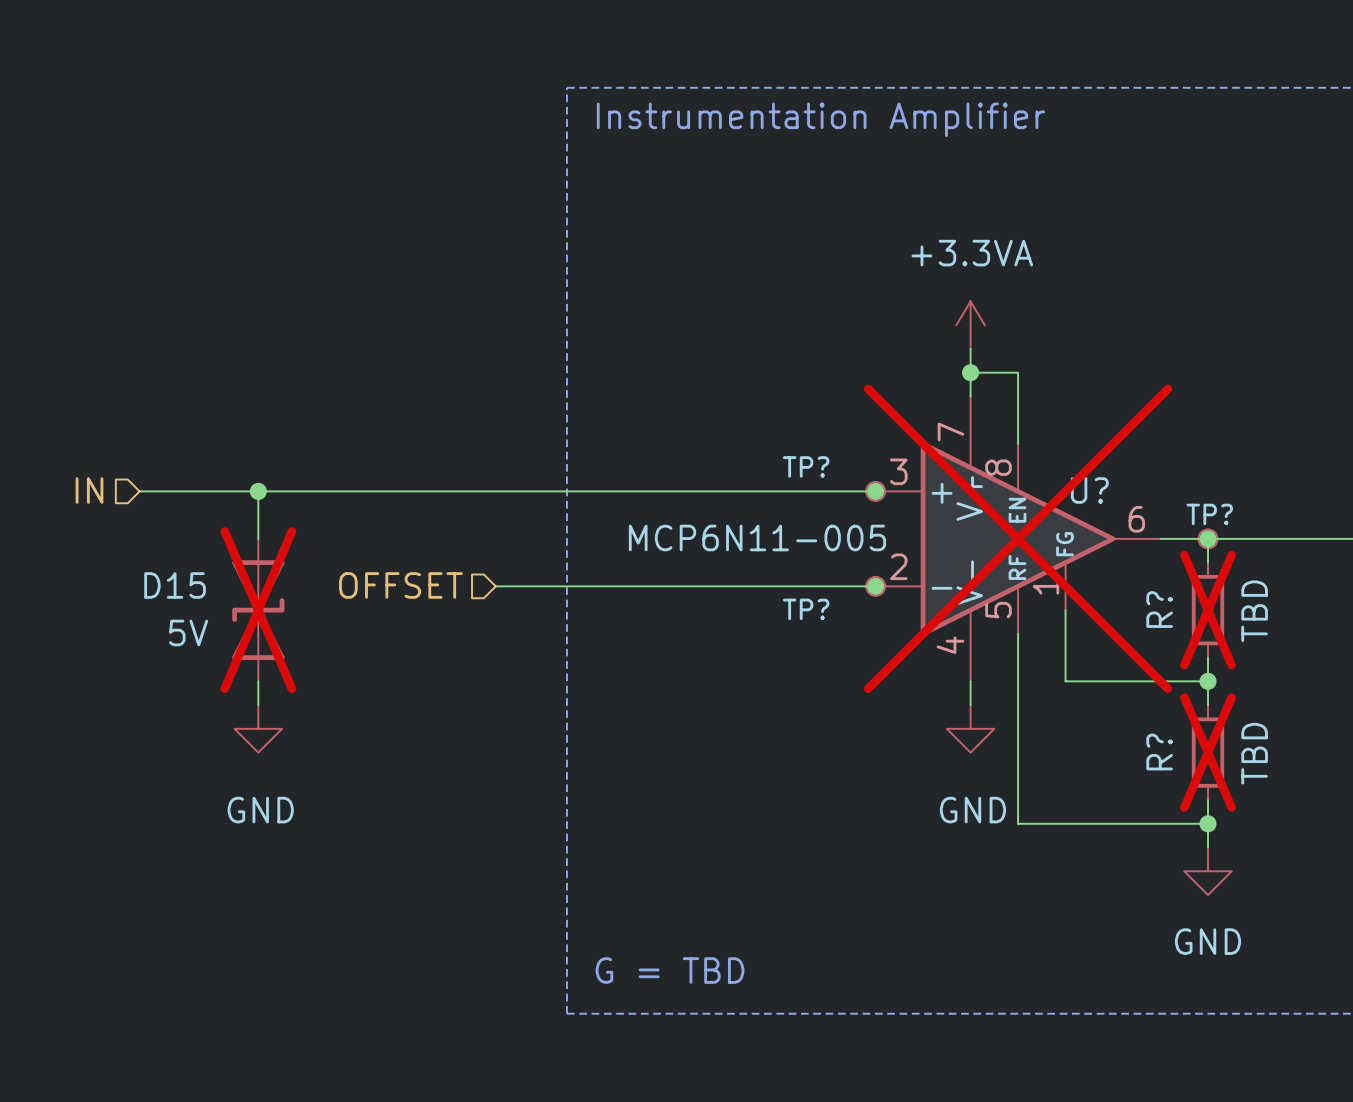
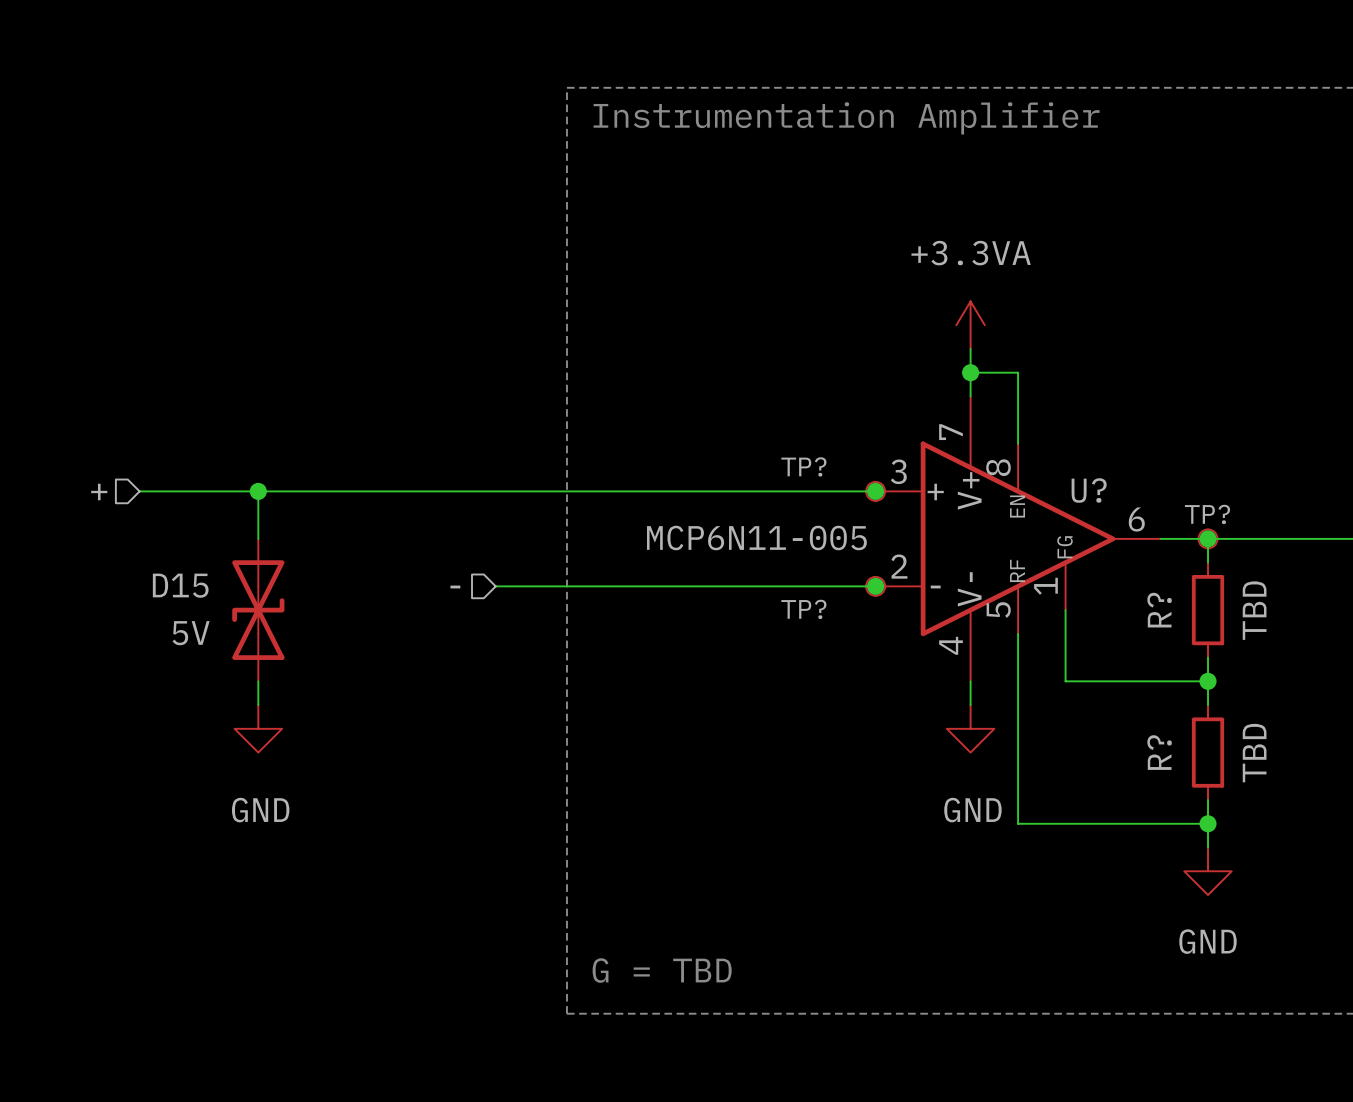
hierarchical label: IN (89, 490) -> + (99, 492)
U? do-not-place cross: (1018, 538) -> none
hierarchical label: OFFSET (400, 585) -> - (455, 587)
D15 do-not-place cross: (258, 610) -> none
R? do-not-place cross: (1208, 610) -> none
R? do-not-place cross: (1208, 752) -> none

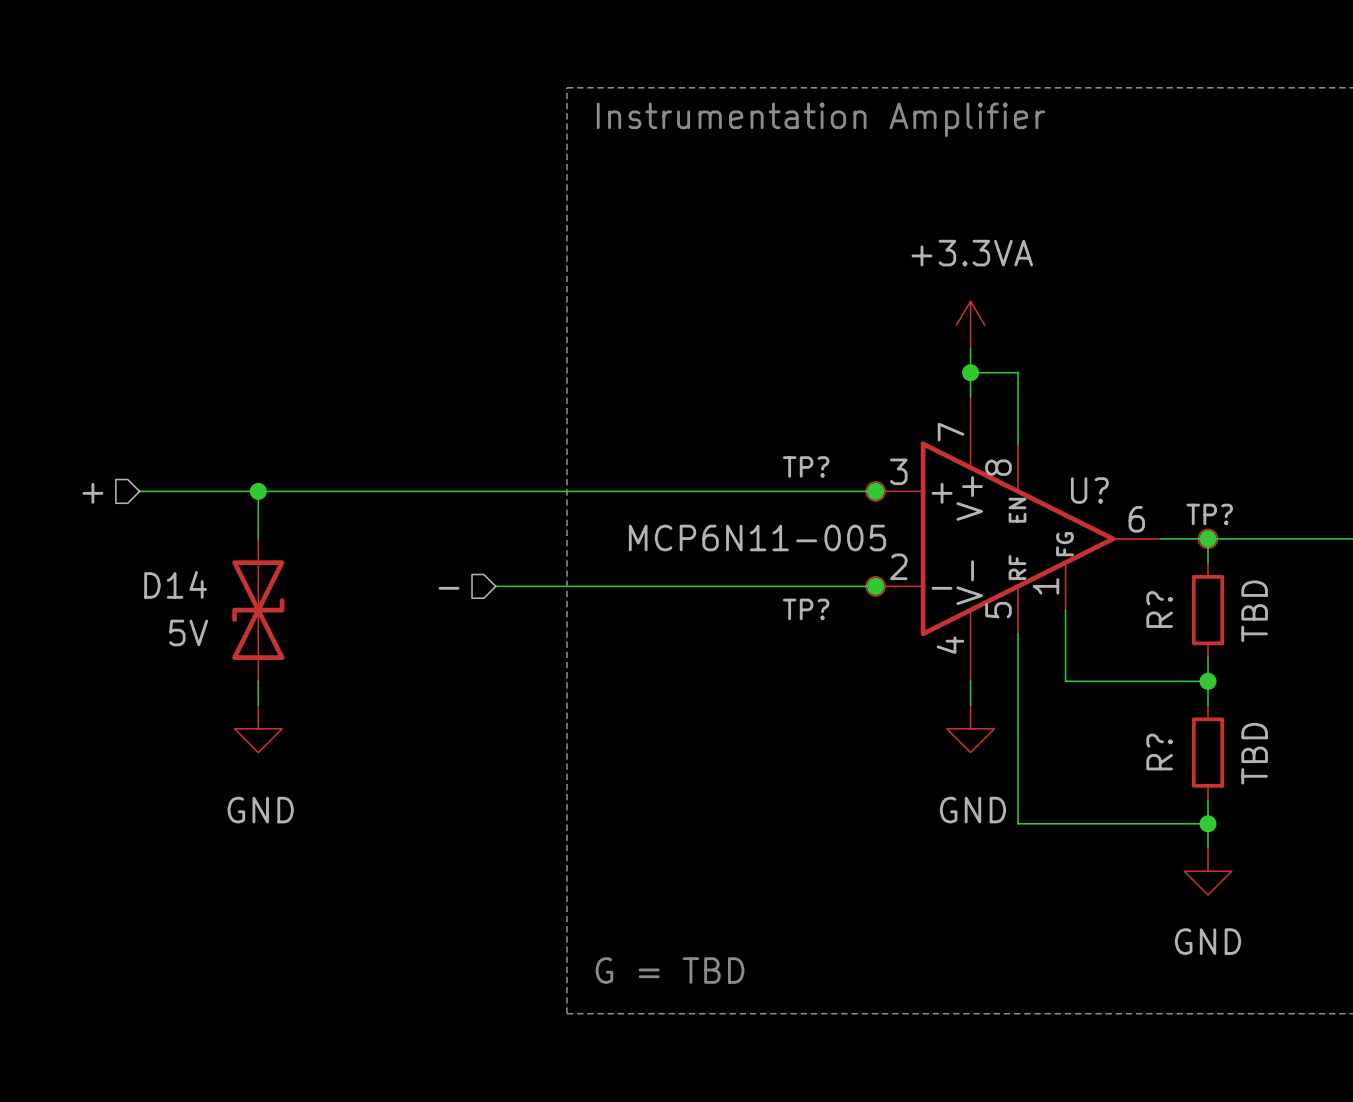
D15 name: D15 (180, 585) -> D14 (175, 584)

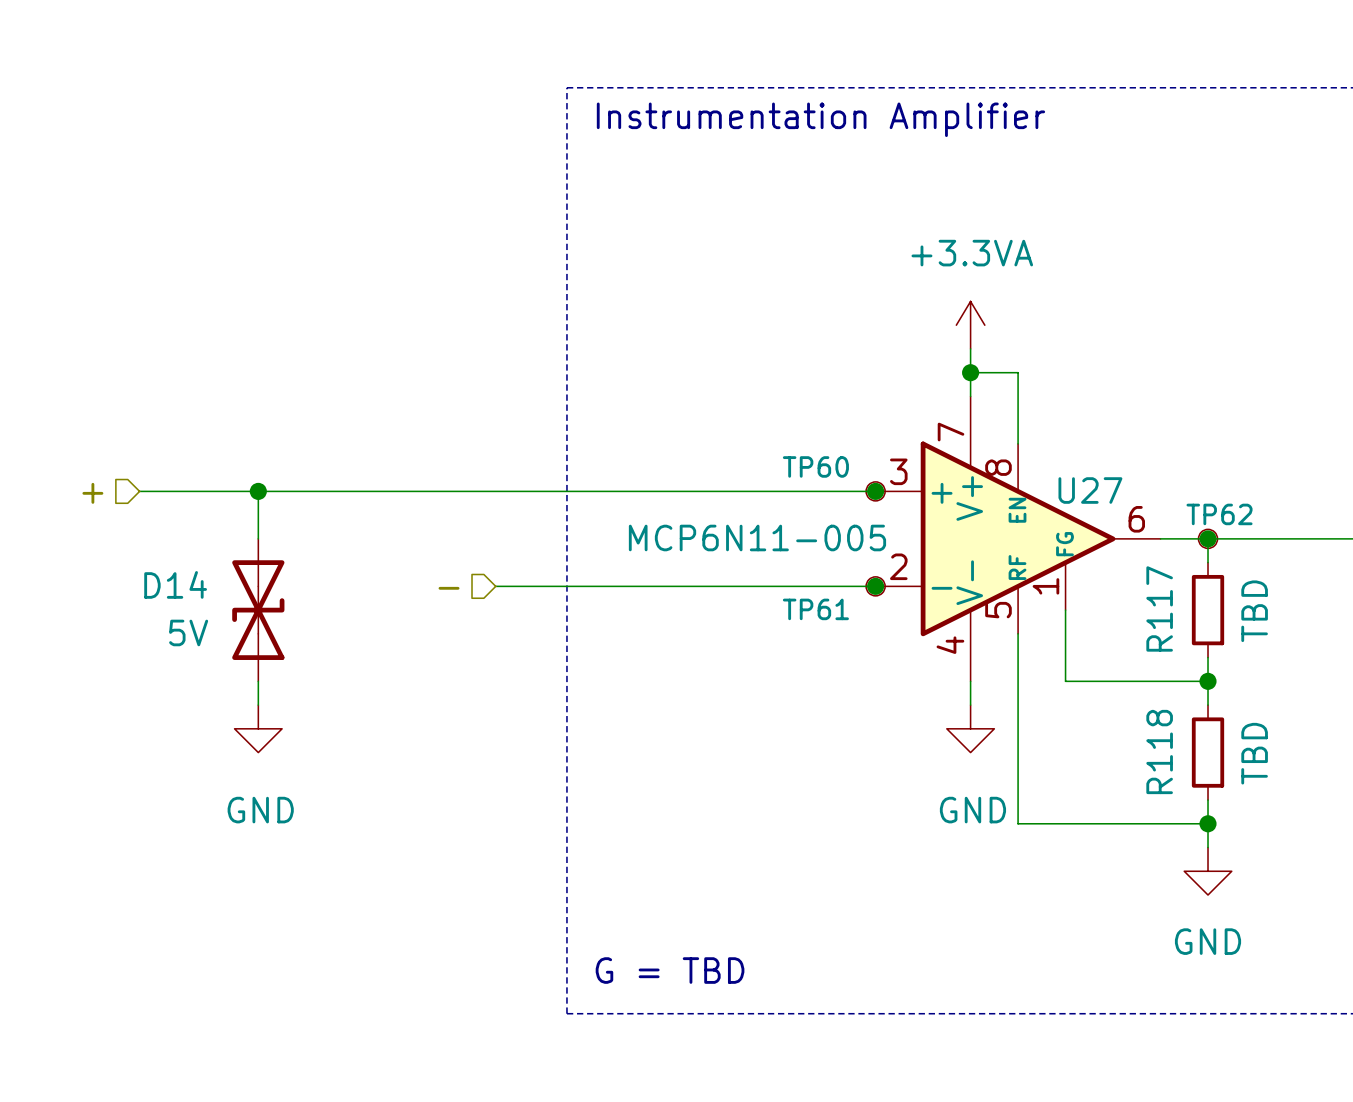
TP? name: TP? (806, 466) -> TP60 (815, 466)
U? name: U? (1089, 490) -> U27 (1090, 490)
TP? name: TP? (1209, 514) -> TP62 (1219, 514)
TP? name: TP? (806, 609) -> TP61 (815, 609)
R? name: R? (1159, 609) -> R117 (1159, 608)
R? name: R? (1159, 751) -> R118 (1159, 751)

